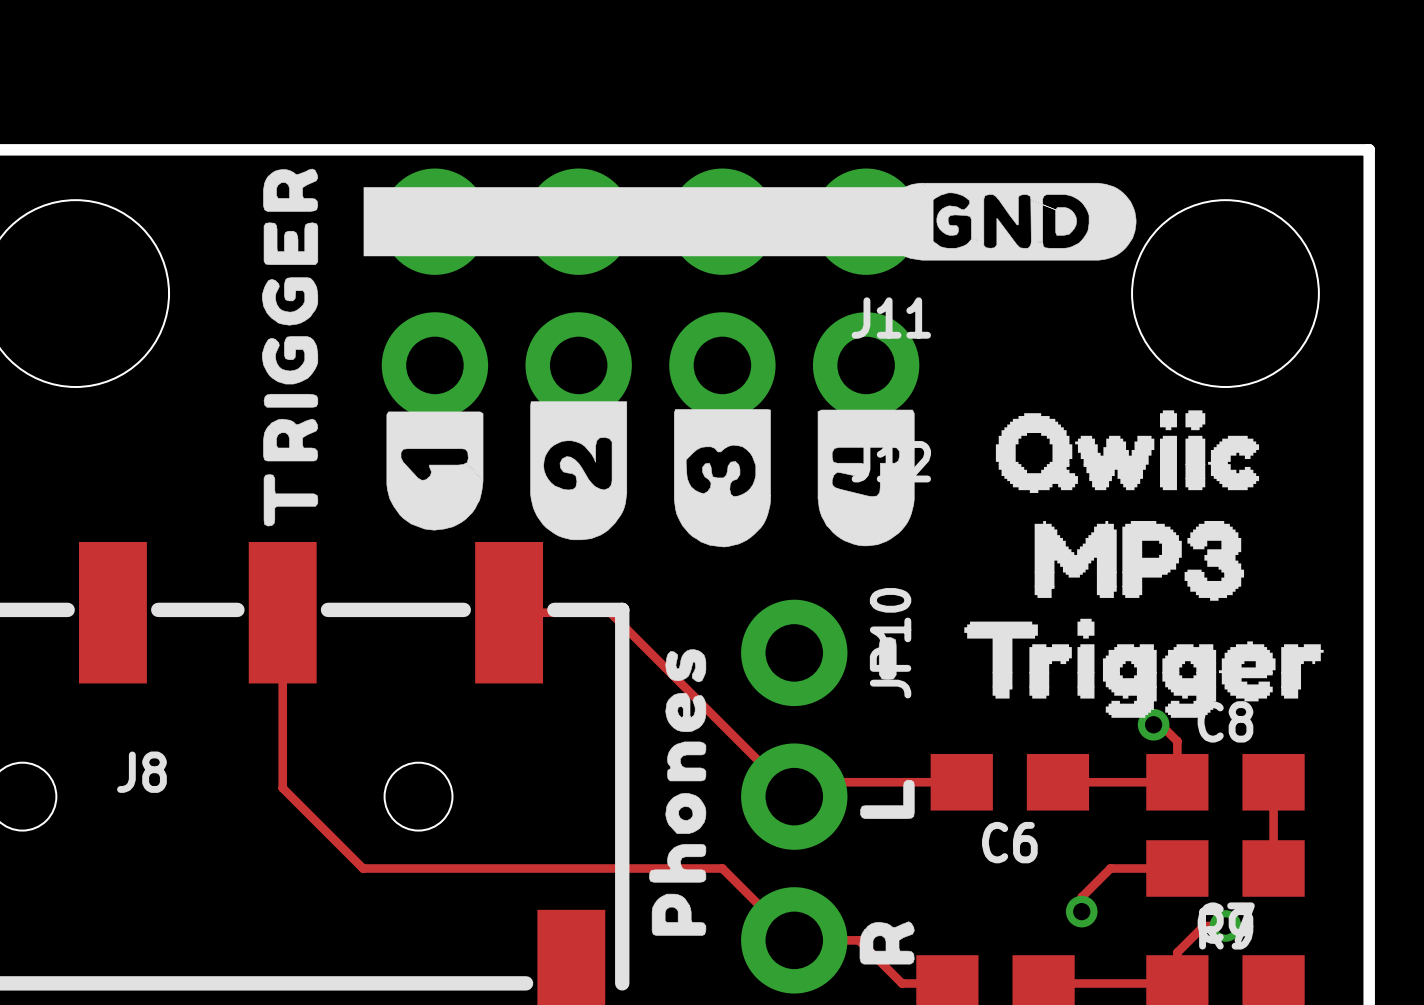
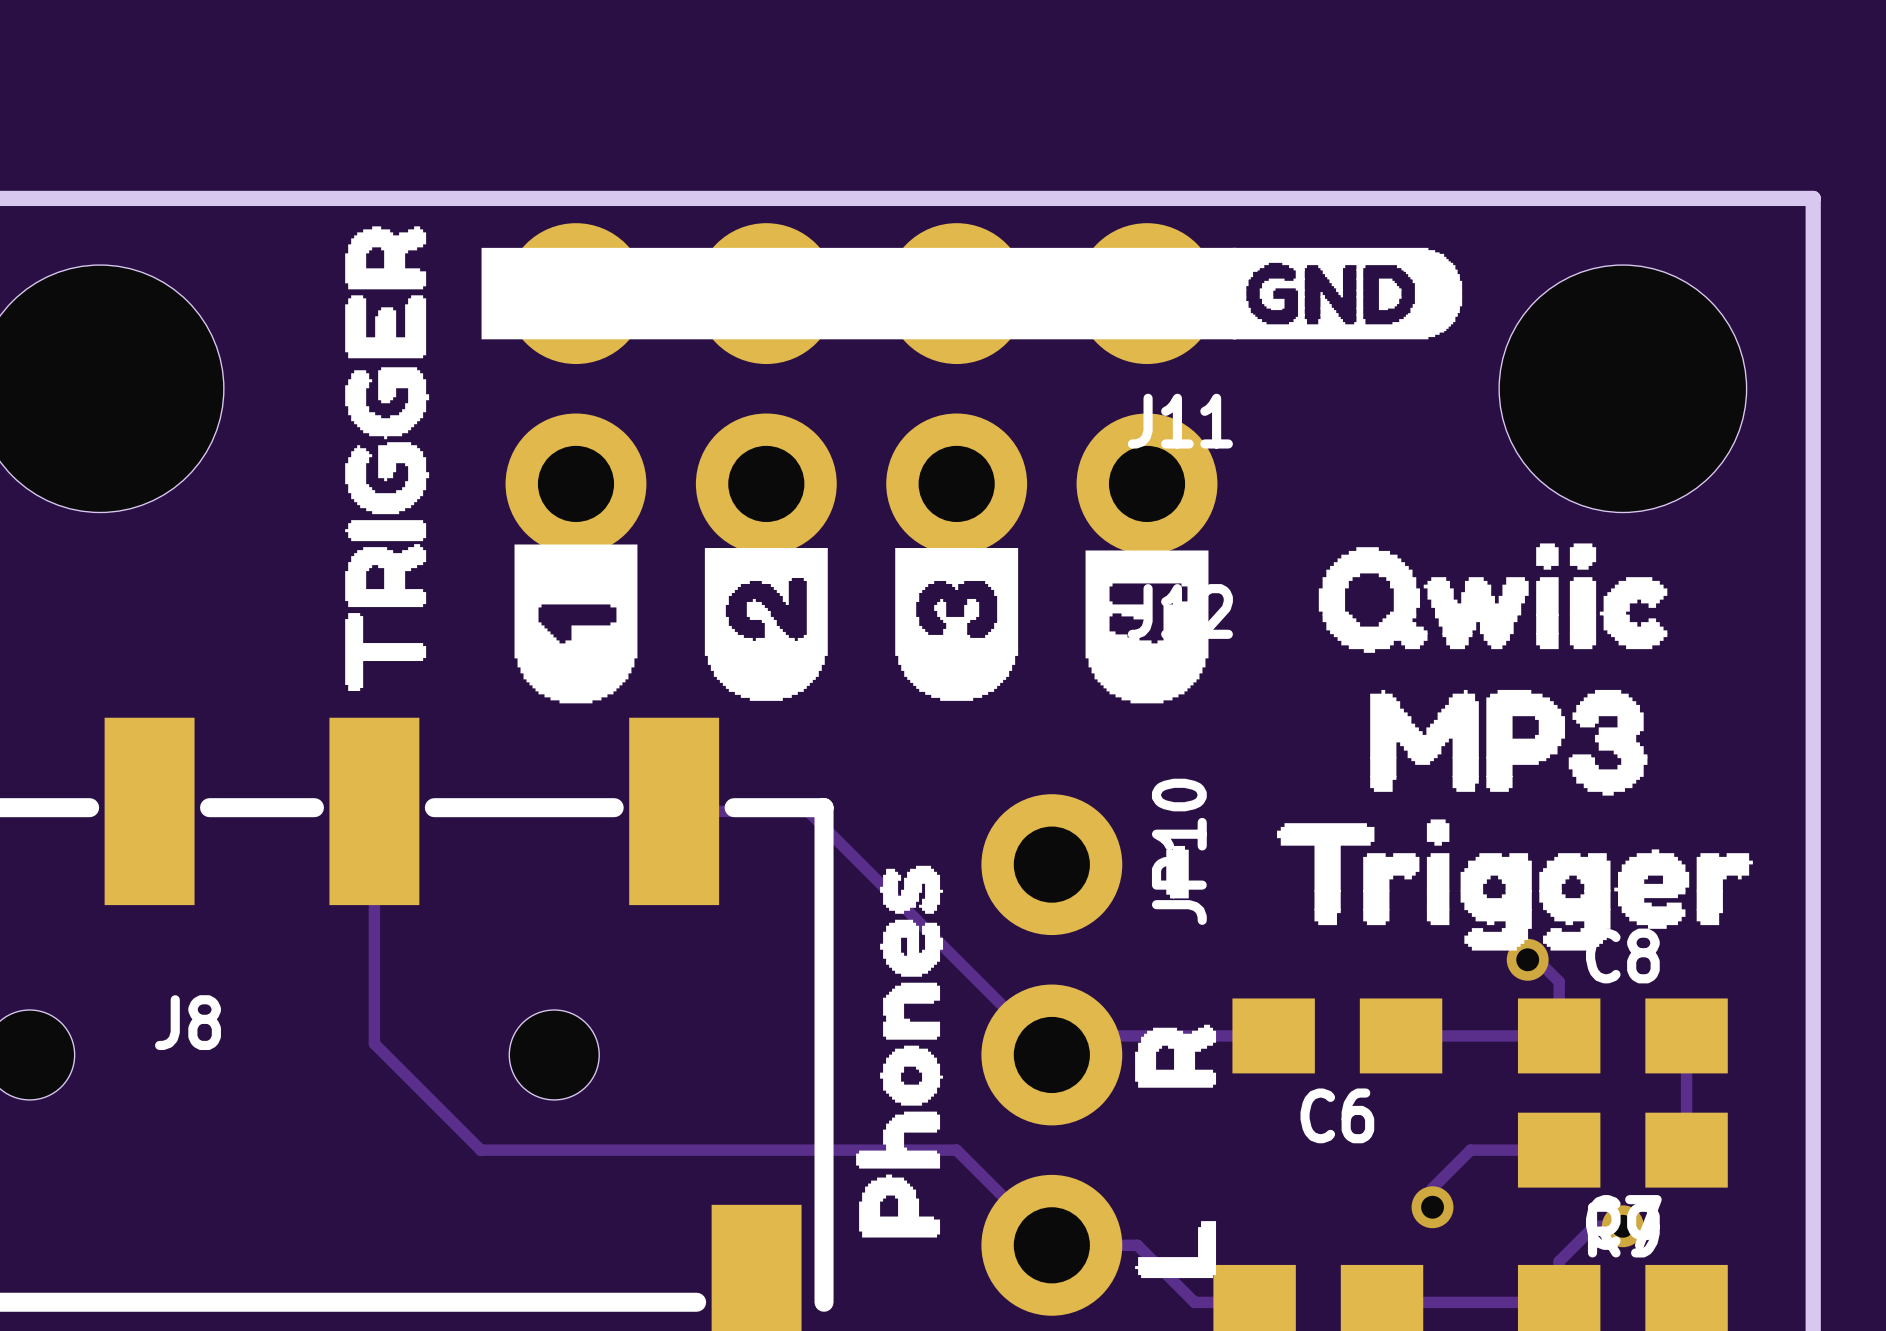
drawing shape: [262, 168, 319, 527] -> [345, 226, 430, 691]
drawing shape: [883, 182, 1137, 261] -> [1199, 247, 1463, 340]
drawing shape: [530, 401, 628, 541] -> [704, 548, 828, 701]
drawing shape: [674, 409, 771, 548] -> [895, 548, 1019, 701]
drawing shape: [817, 409, 915, 547] -> [1085, 550, 1209, 704]
drawing shape: [386, 411, 484, 531] -> [514, 544, 638, 704]
drawing shape: [878, 637, 897, 680] -> [1166, 845, 1189, 899]
drawing shape: [649, 649, 707, 936] -> [856, 865, 944, 1238]
drawing shape: [860, 779, 915, 819] -> [1135, 1024, 1217, 1088]
drawing shape: [859, 921, 915, 965] -> [1135, 1221, 1217, 1279]

